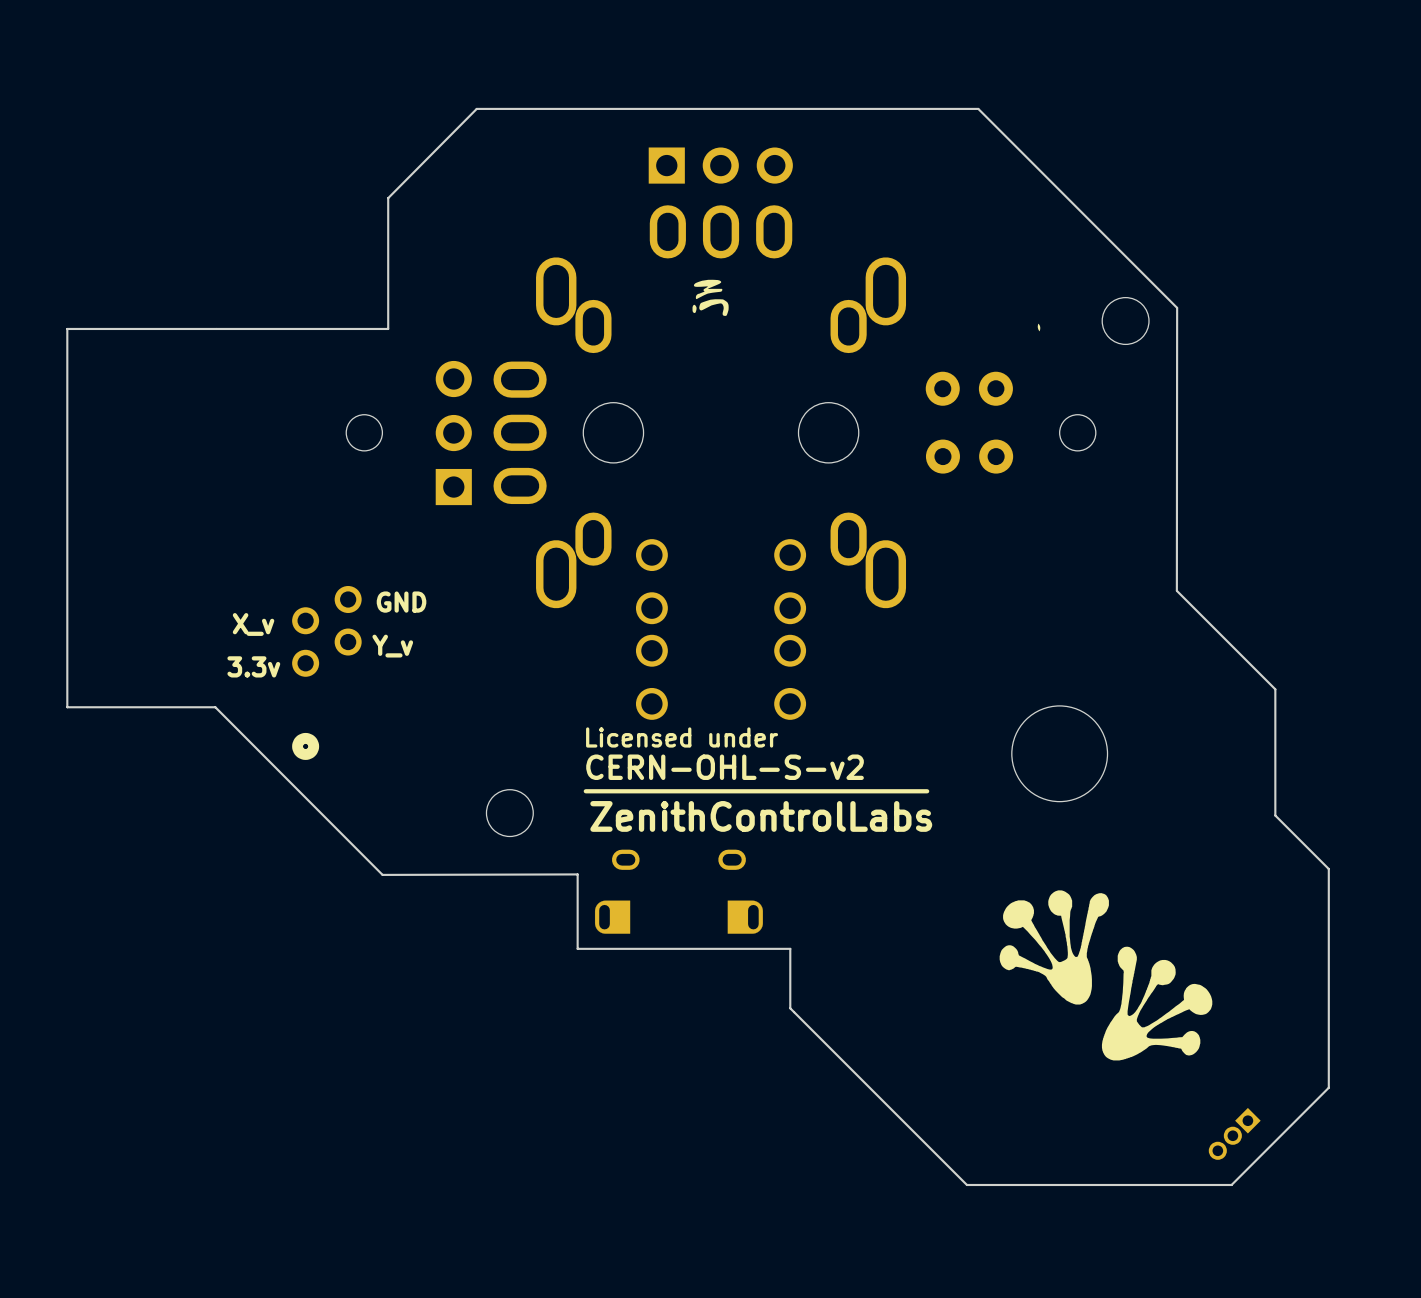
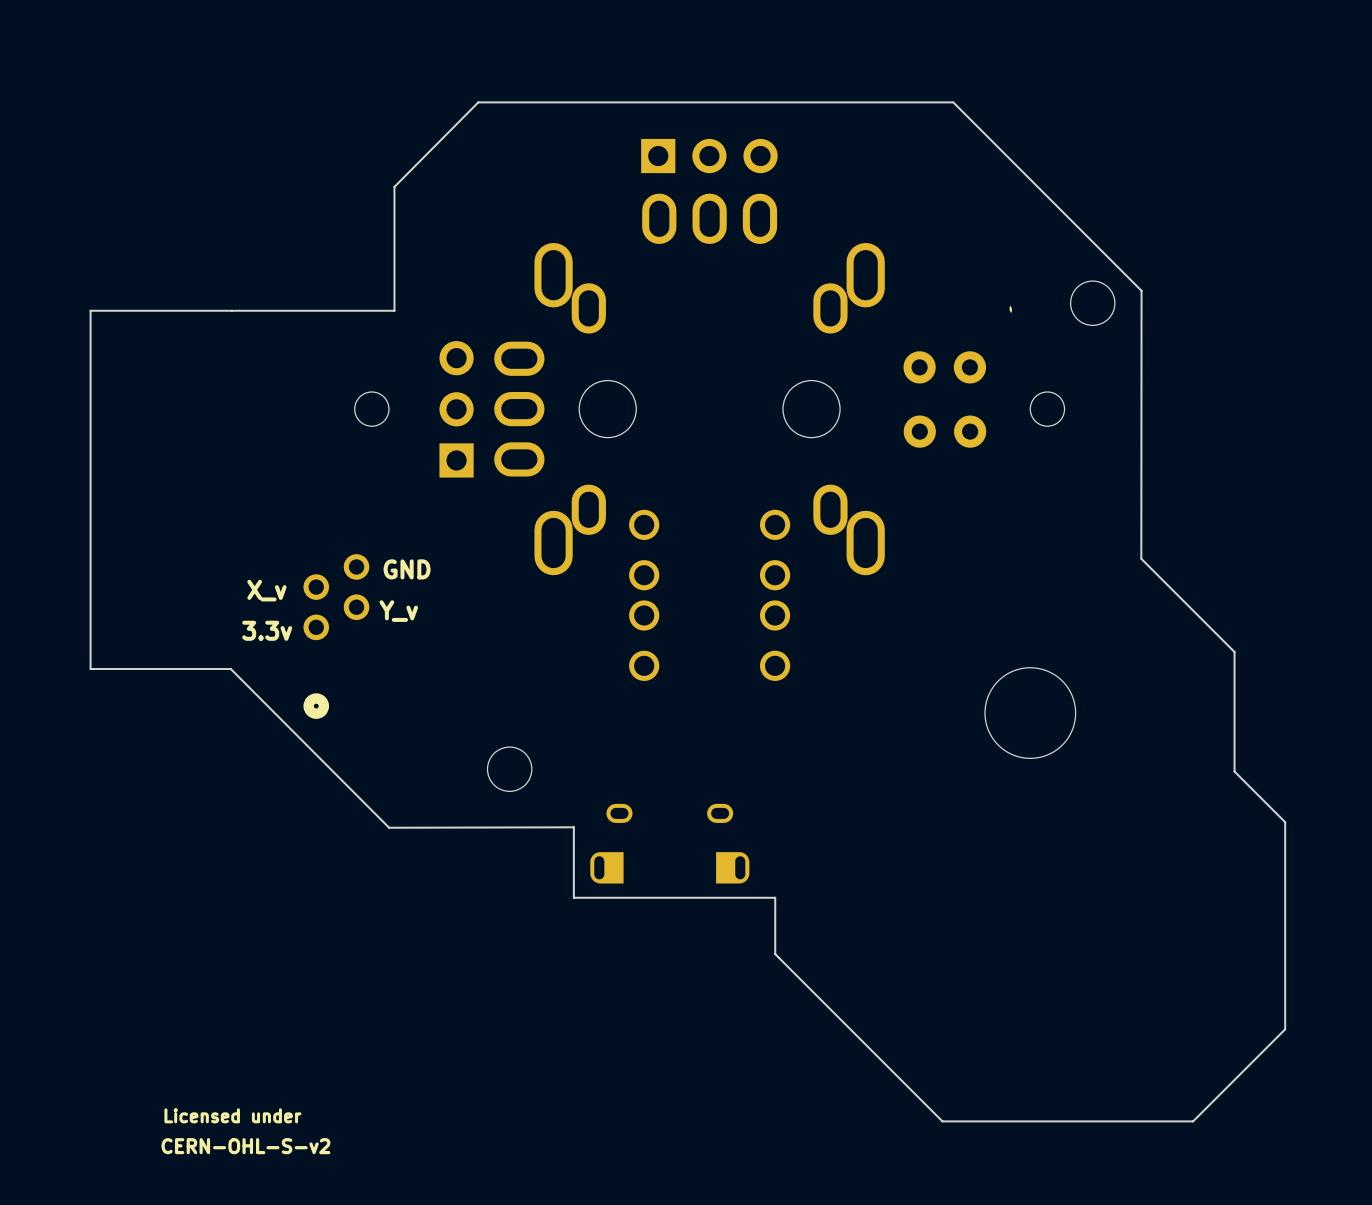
drawing: [692, 279, 729, 316] -> none
text: Licensed under (682, 737) -> none
text: CERN-OHL-S-v2 (725, 767) -> none
line: (927, 791) (585, 791) -> none
text: ZenithControlLabs (761, 816) -> none
drawing: [999, 890, 1213, 1061] -> none
part: (1234, 1133) -> none
text: none -> Licensed under (232, 1115)
text: none -> CERN-OHL-S-v2 (245, 1146)

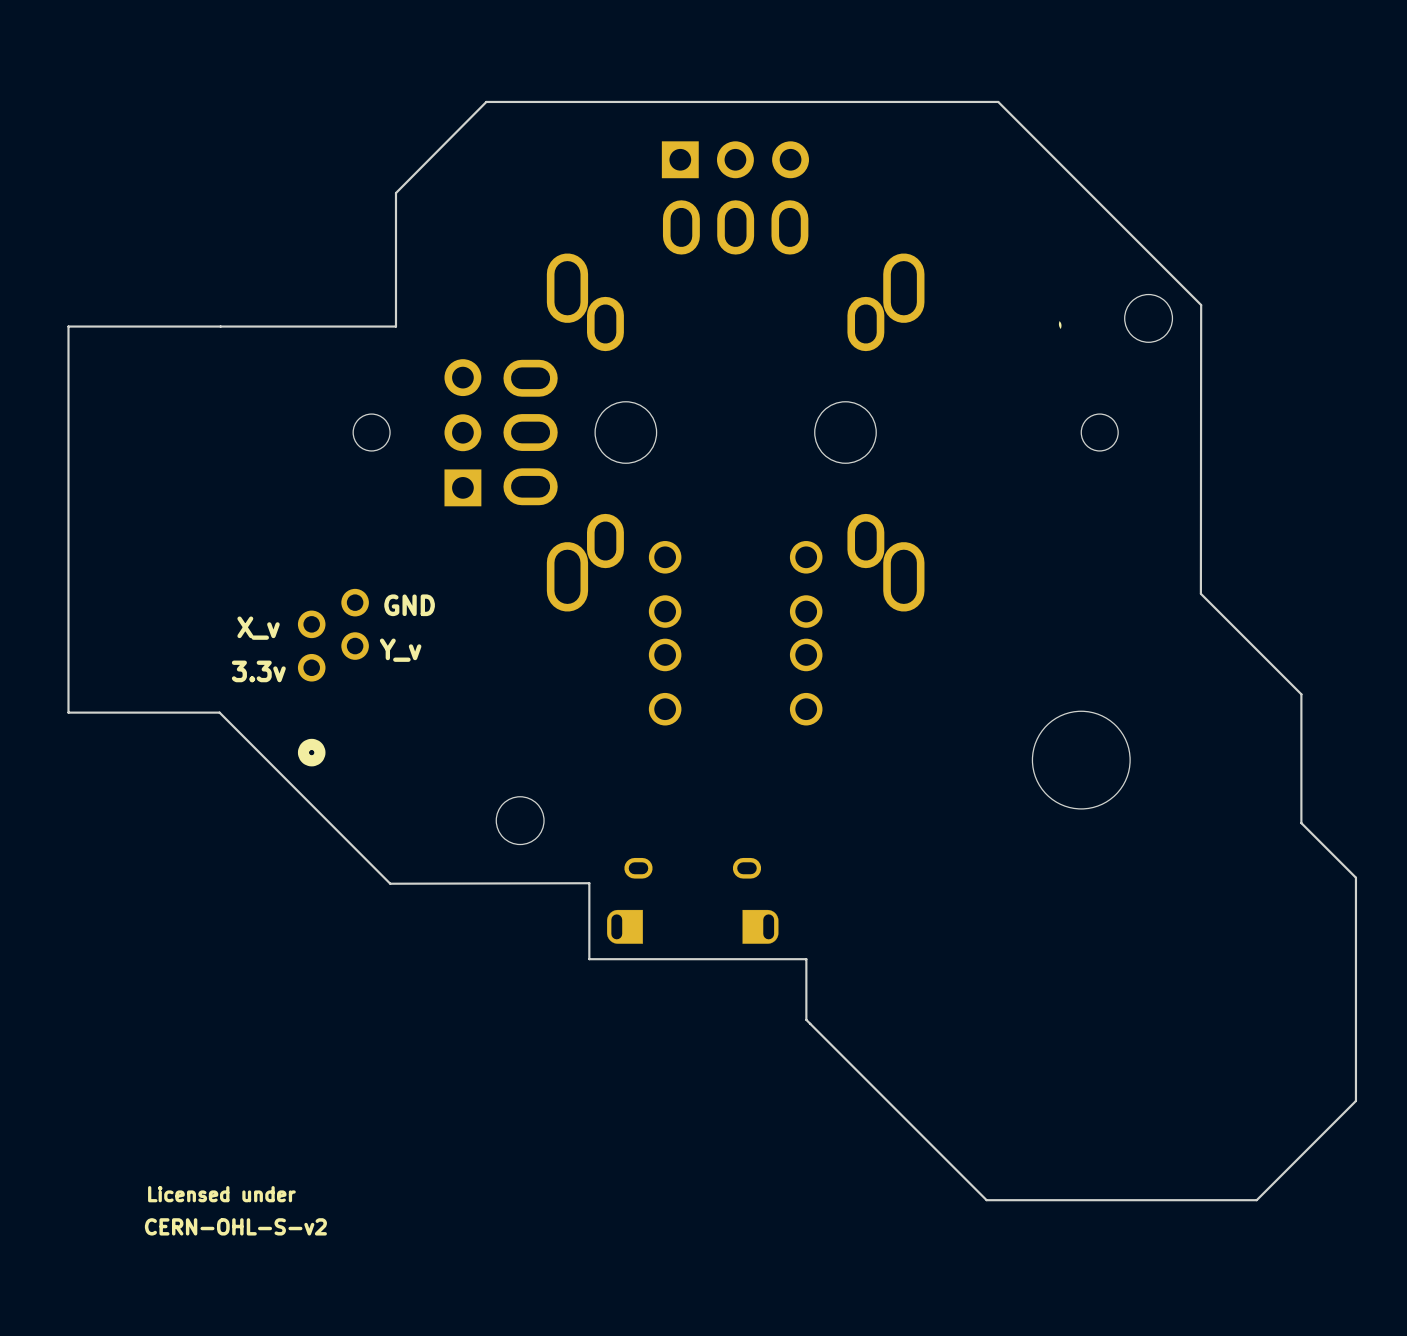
part: (944, 367) -> none
part: (944, 431) -> none

